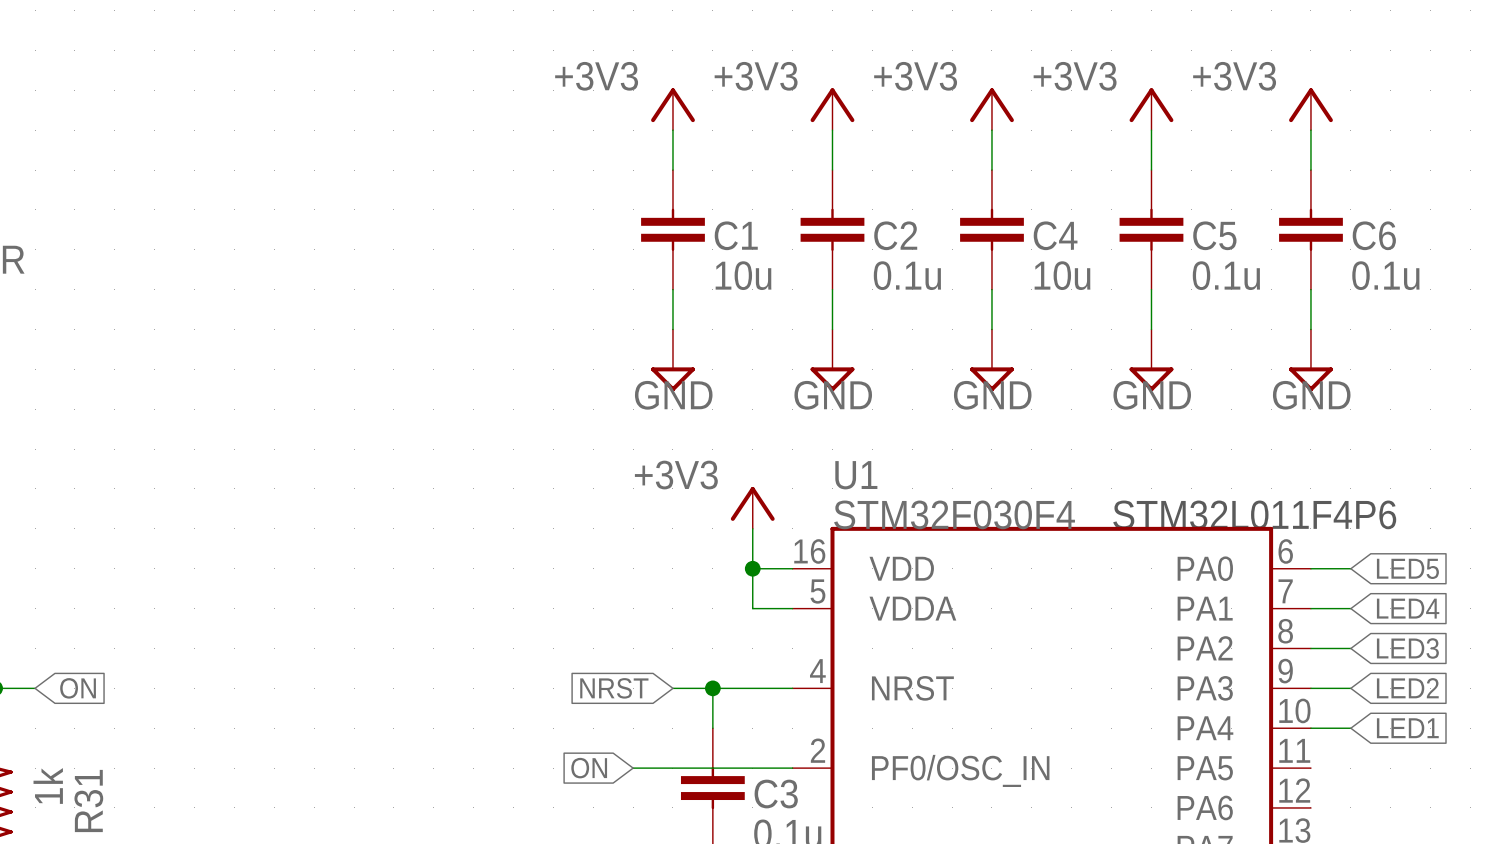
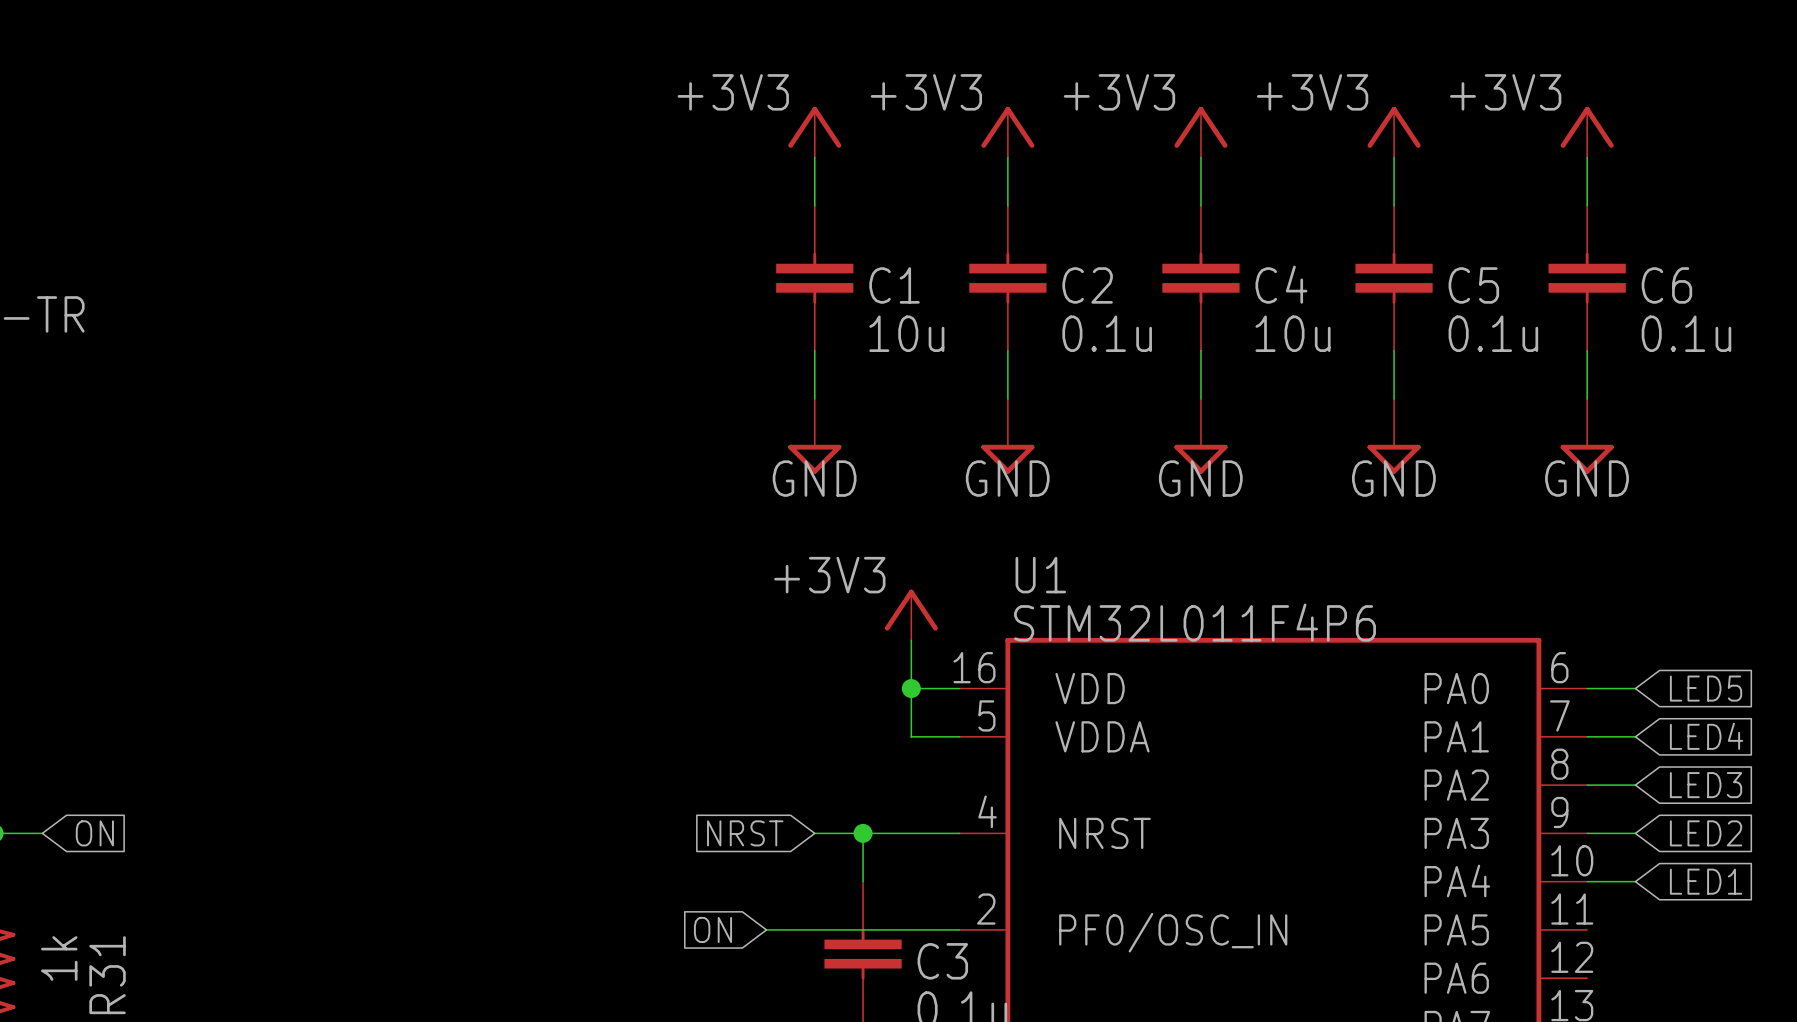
U1 value: STM32F030F4 (954, 514) -> STM32L011F4P6 (1195, 622)
text: STM32L011F4P6 (1254, 514) -> none

